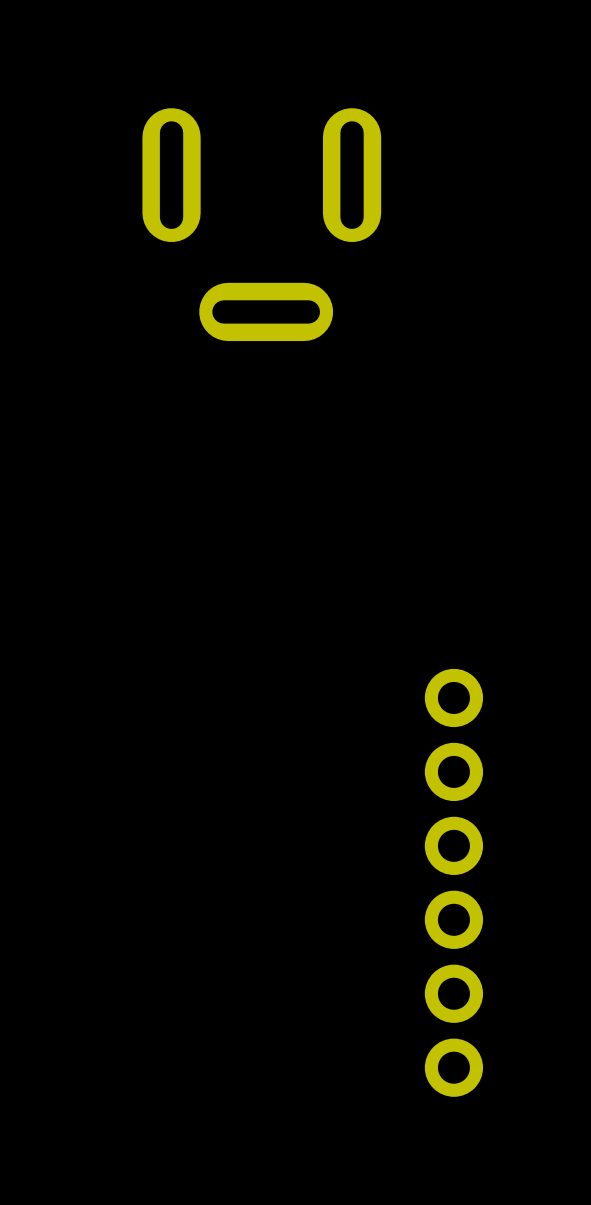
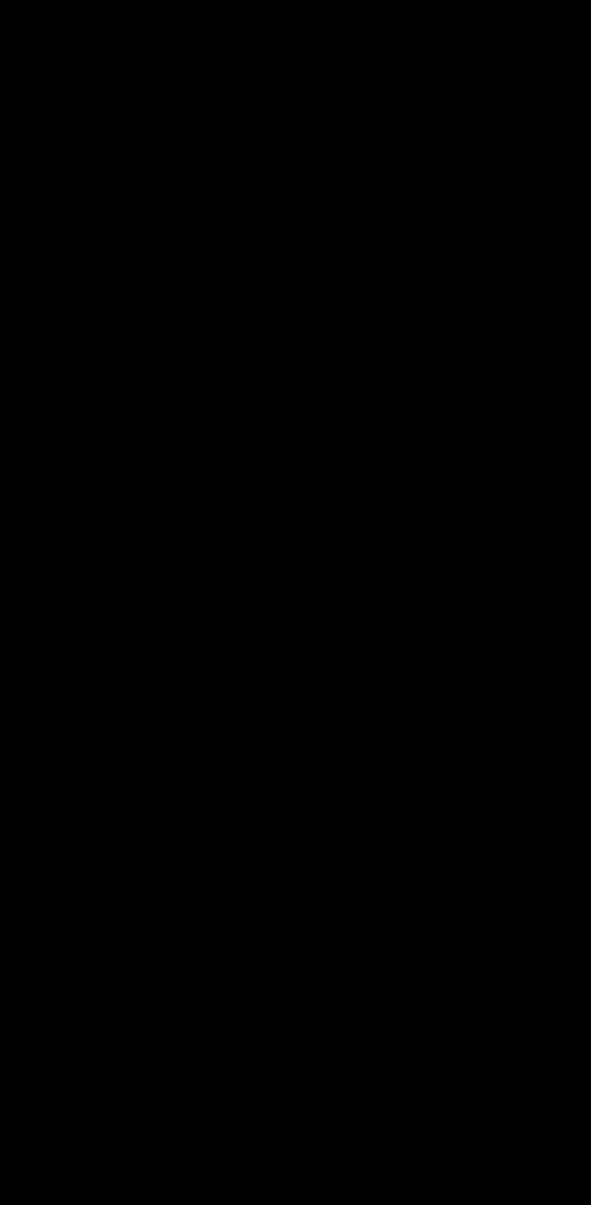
part: (261, 224) -> none
part: (453, 882) -> none

